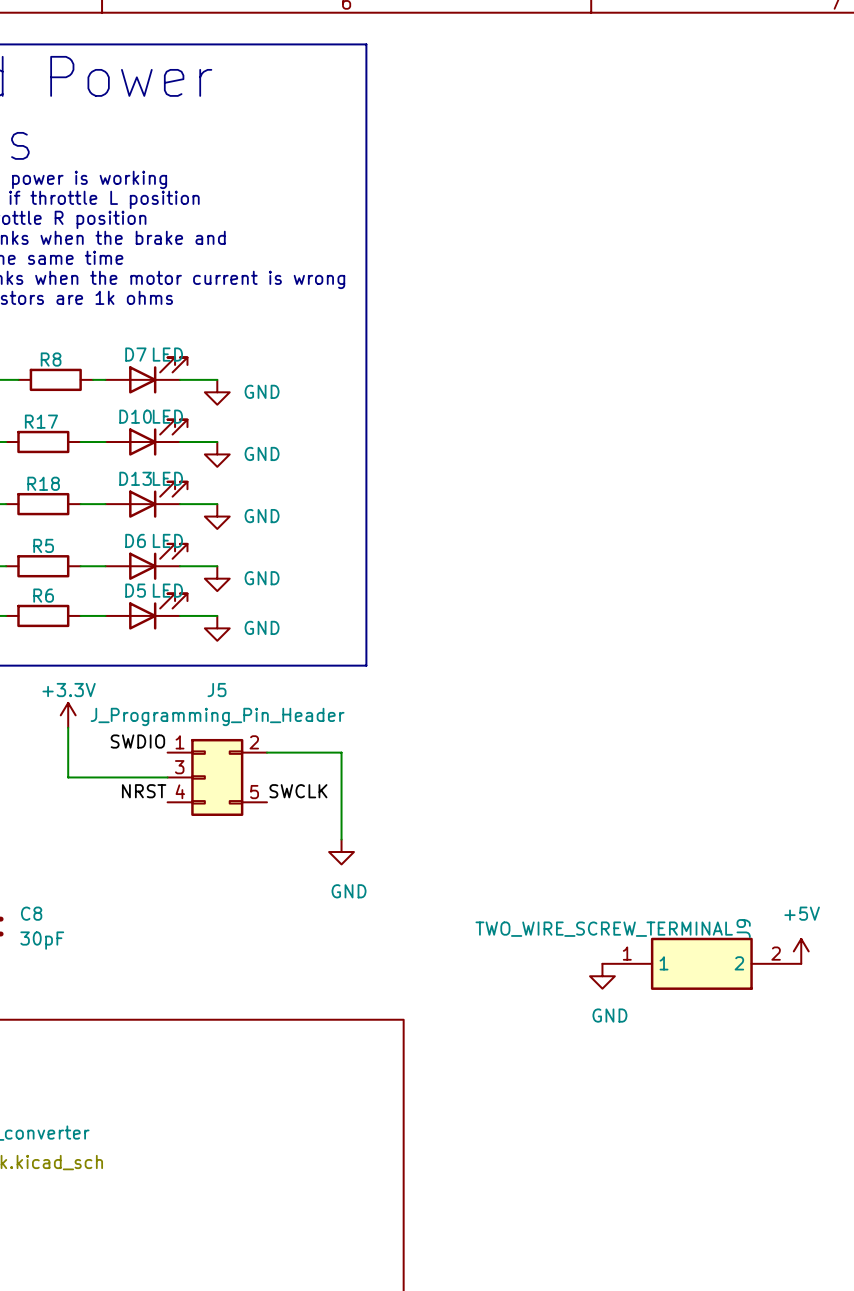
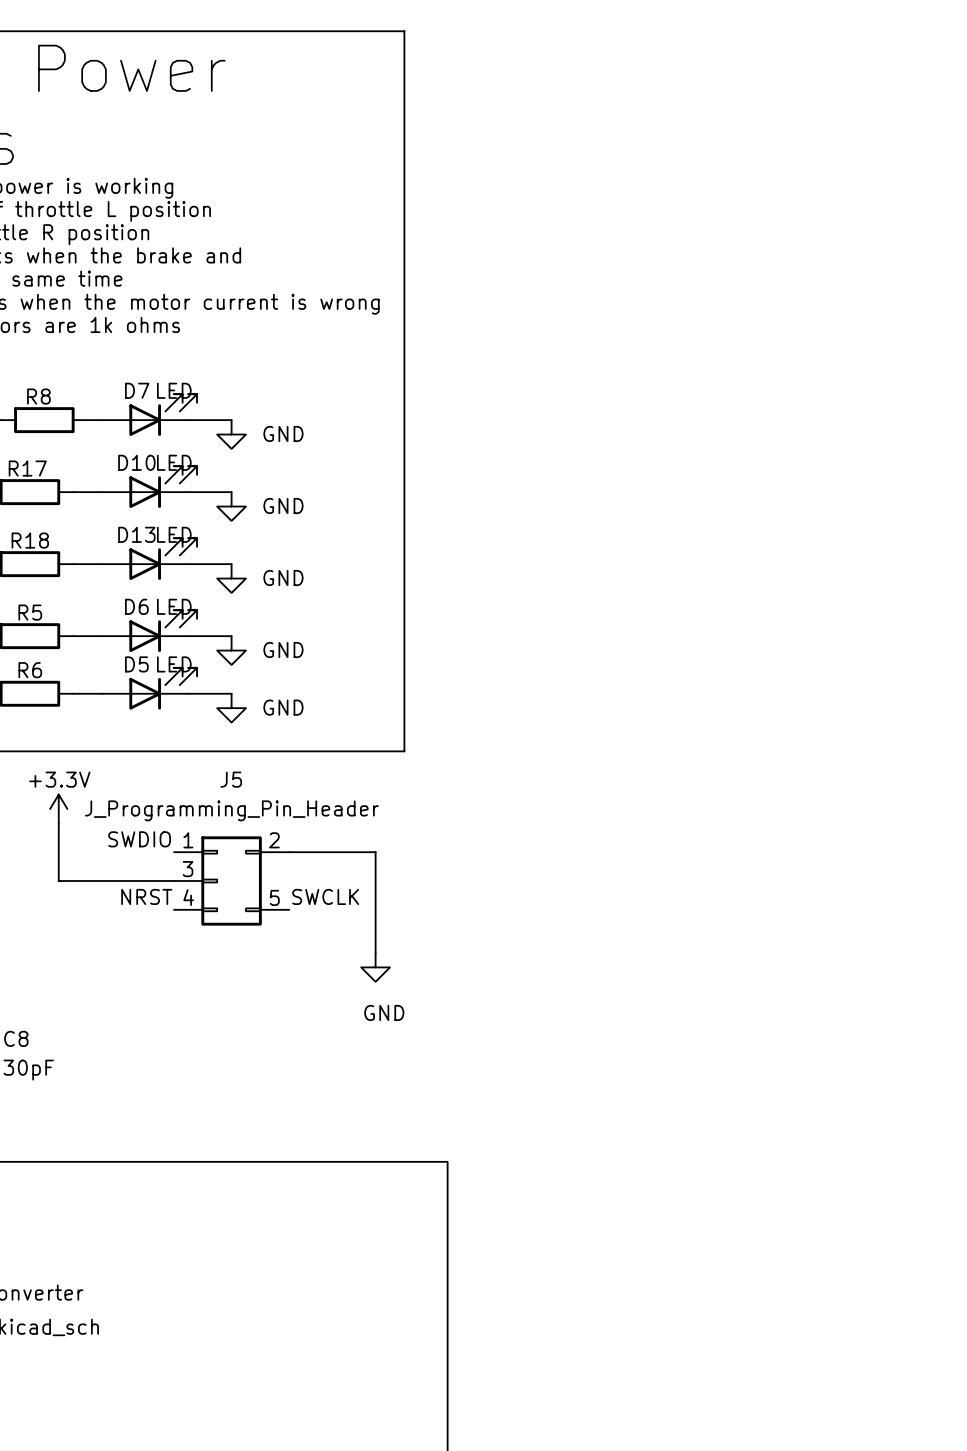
J9: TWO_WIRE_SCREW_TERMINAL (645, 945) -> none
power symbol: +5V (801, 951) -> none
power symbol: GND (602, 976) -> none

